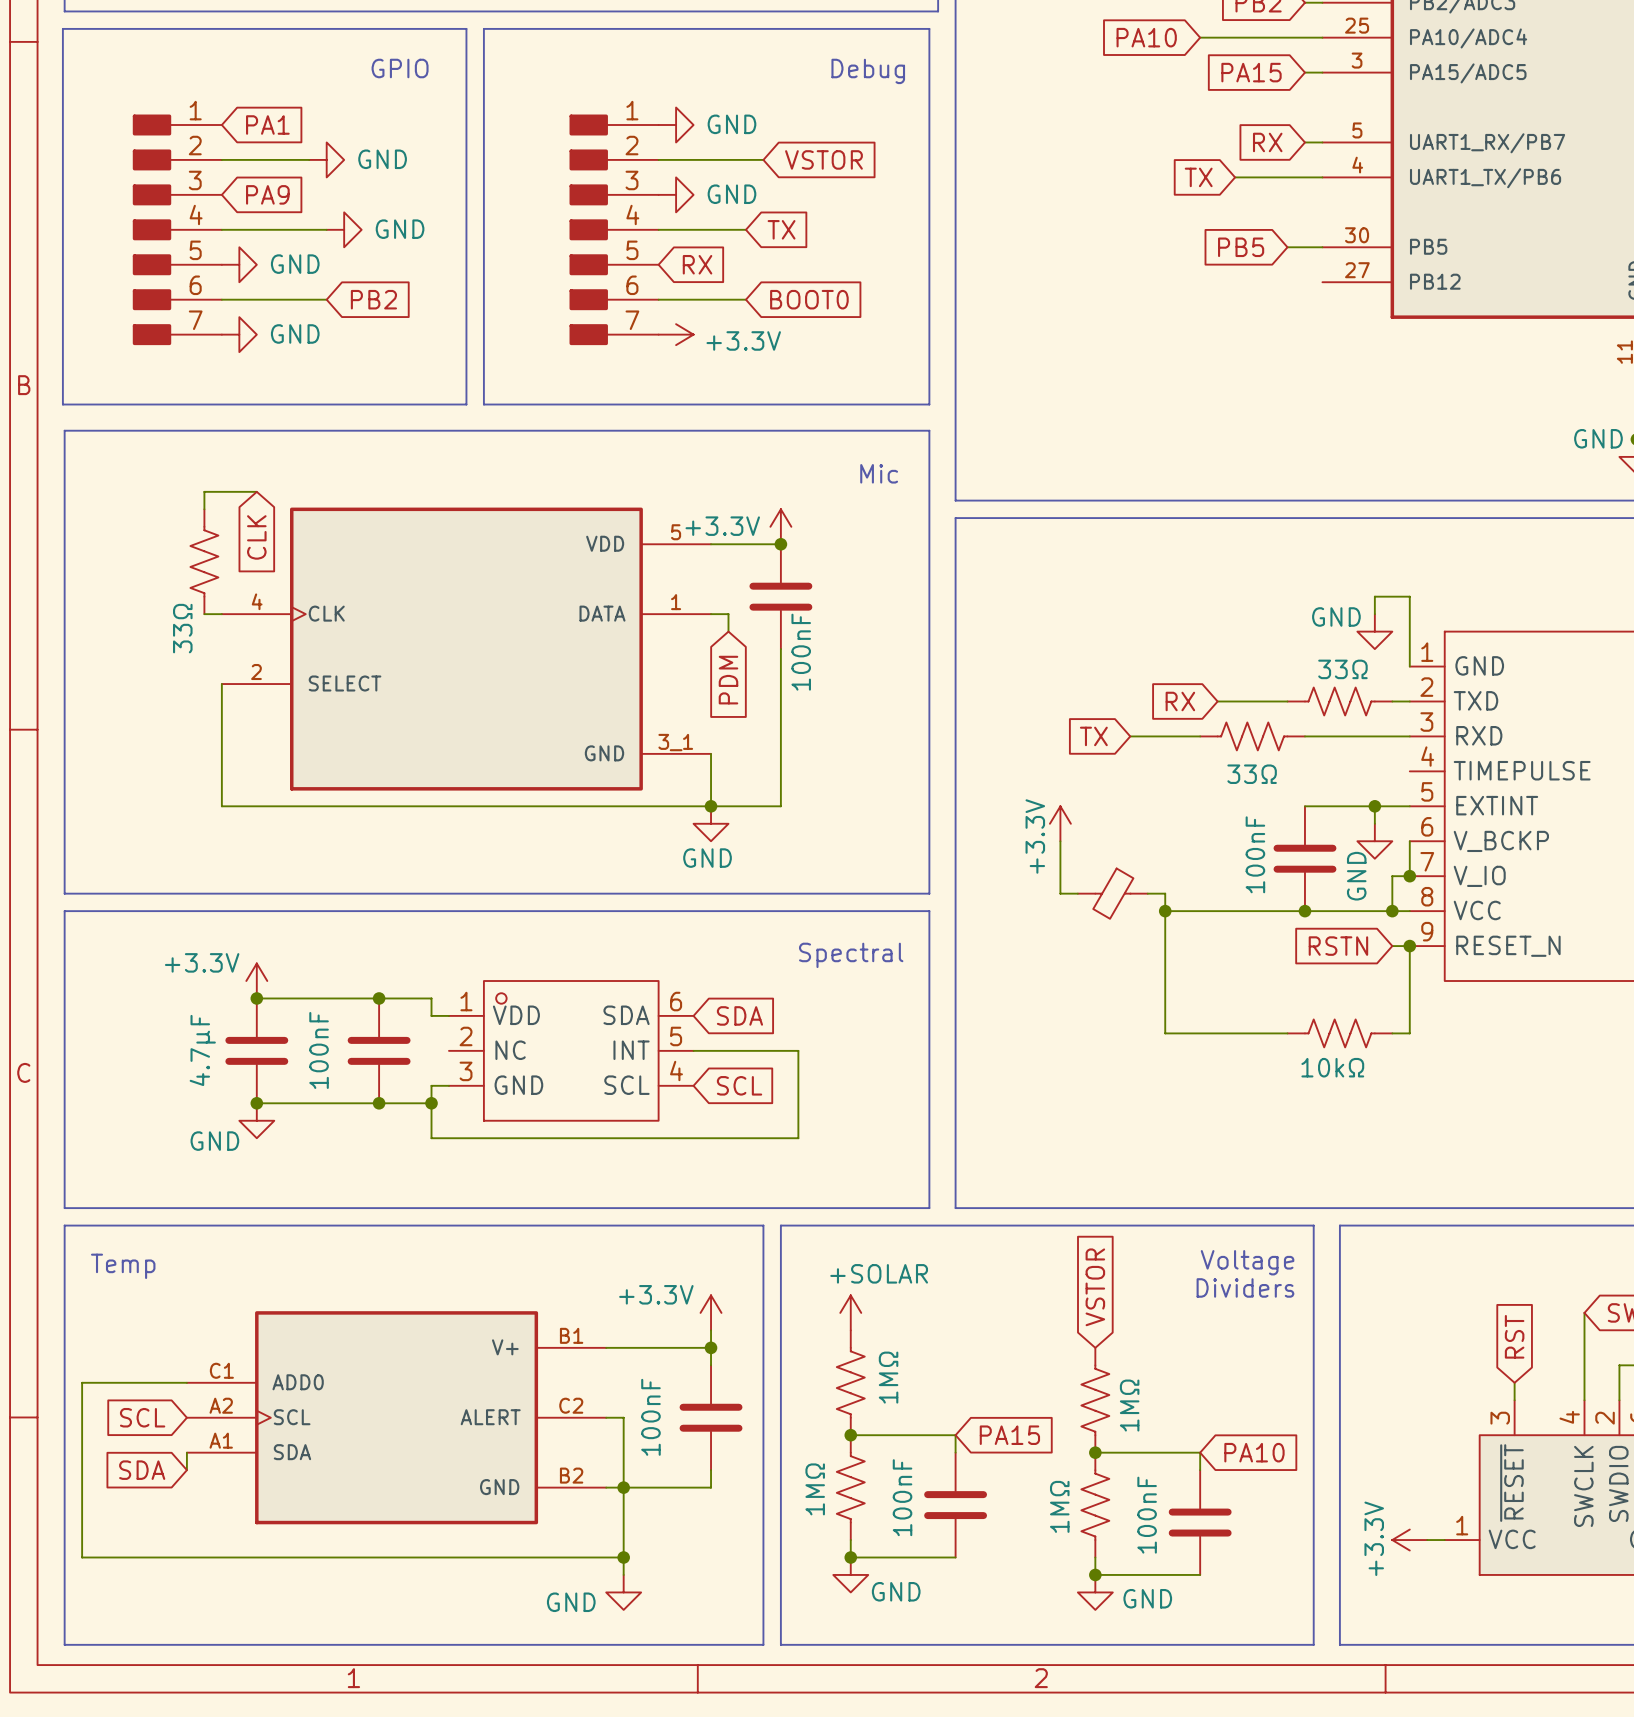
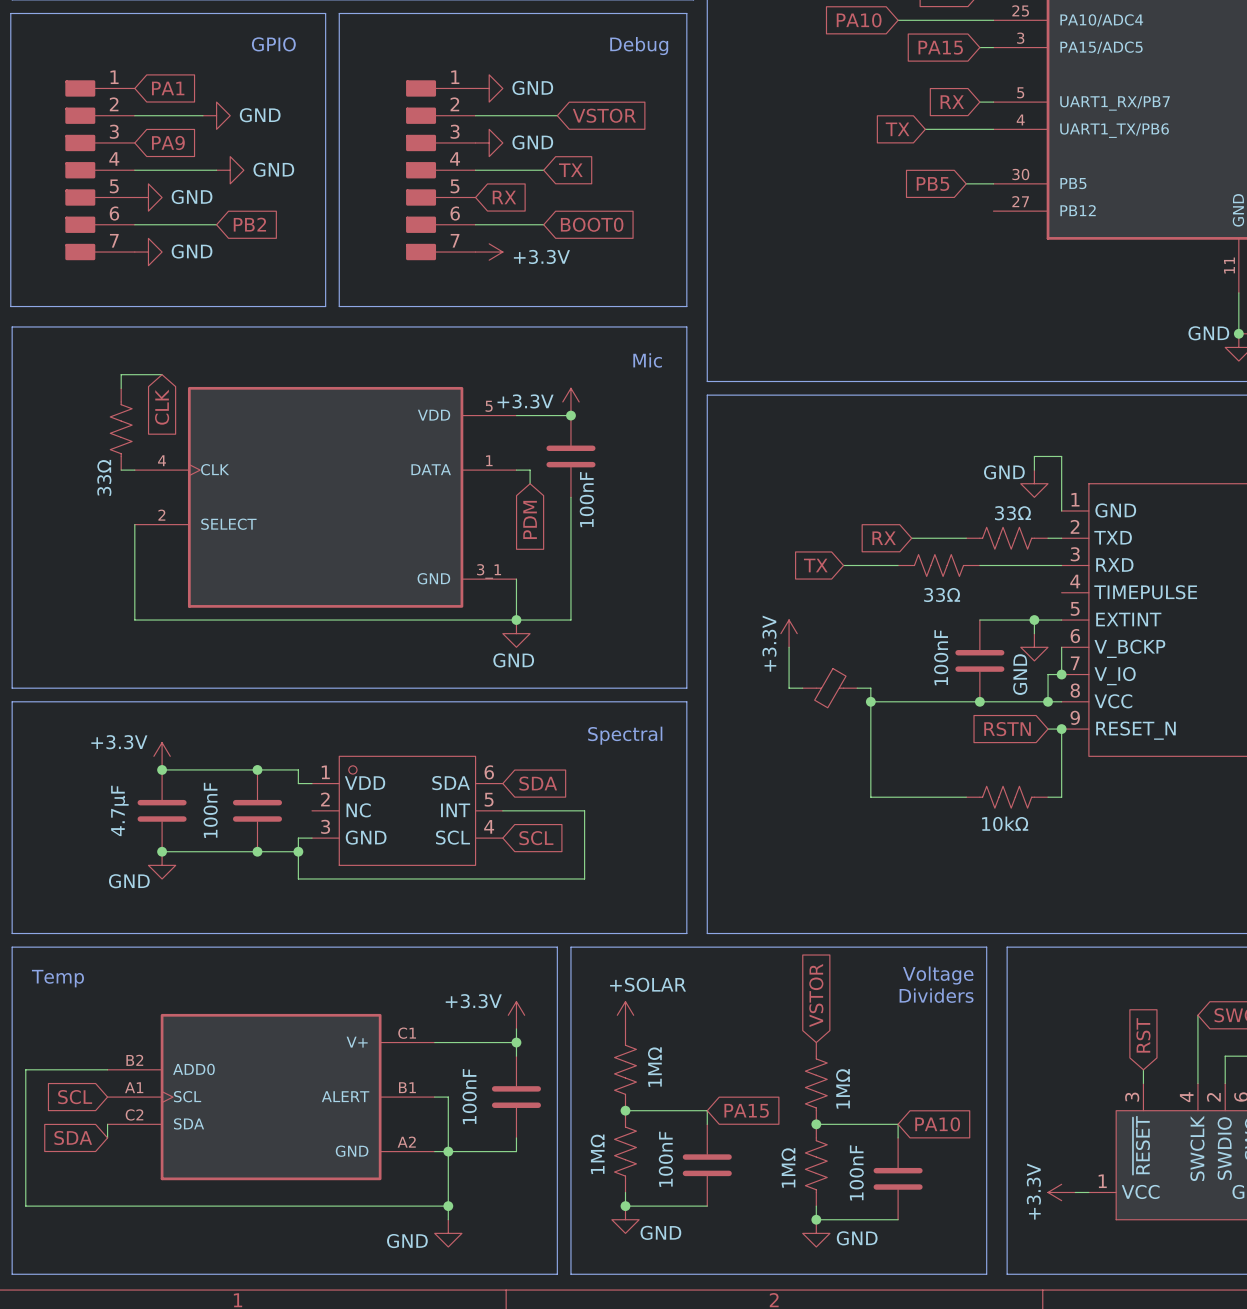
part pin number: B1 (571, 1335) -> C1 (407, 1033)
part pin number: C1 (221, 1370) -> B2 (134, 1060)
part pin number: A2 (221, 1405) -> A1 (134, 1087)
part pin number: C2 (571, 1405) -> B1 (407, 1087)
part pin number: A1 (221, 1440) -> C2 (134, 1114)
part pin number: B2 (571, 1475) -> A2 (406, 1142)

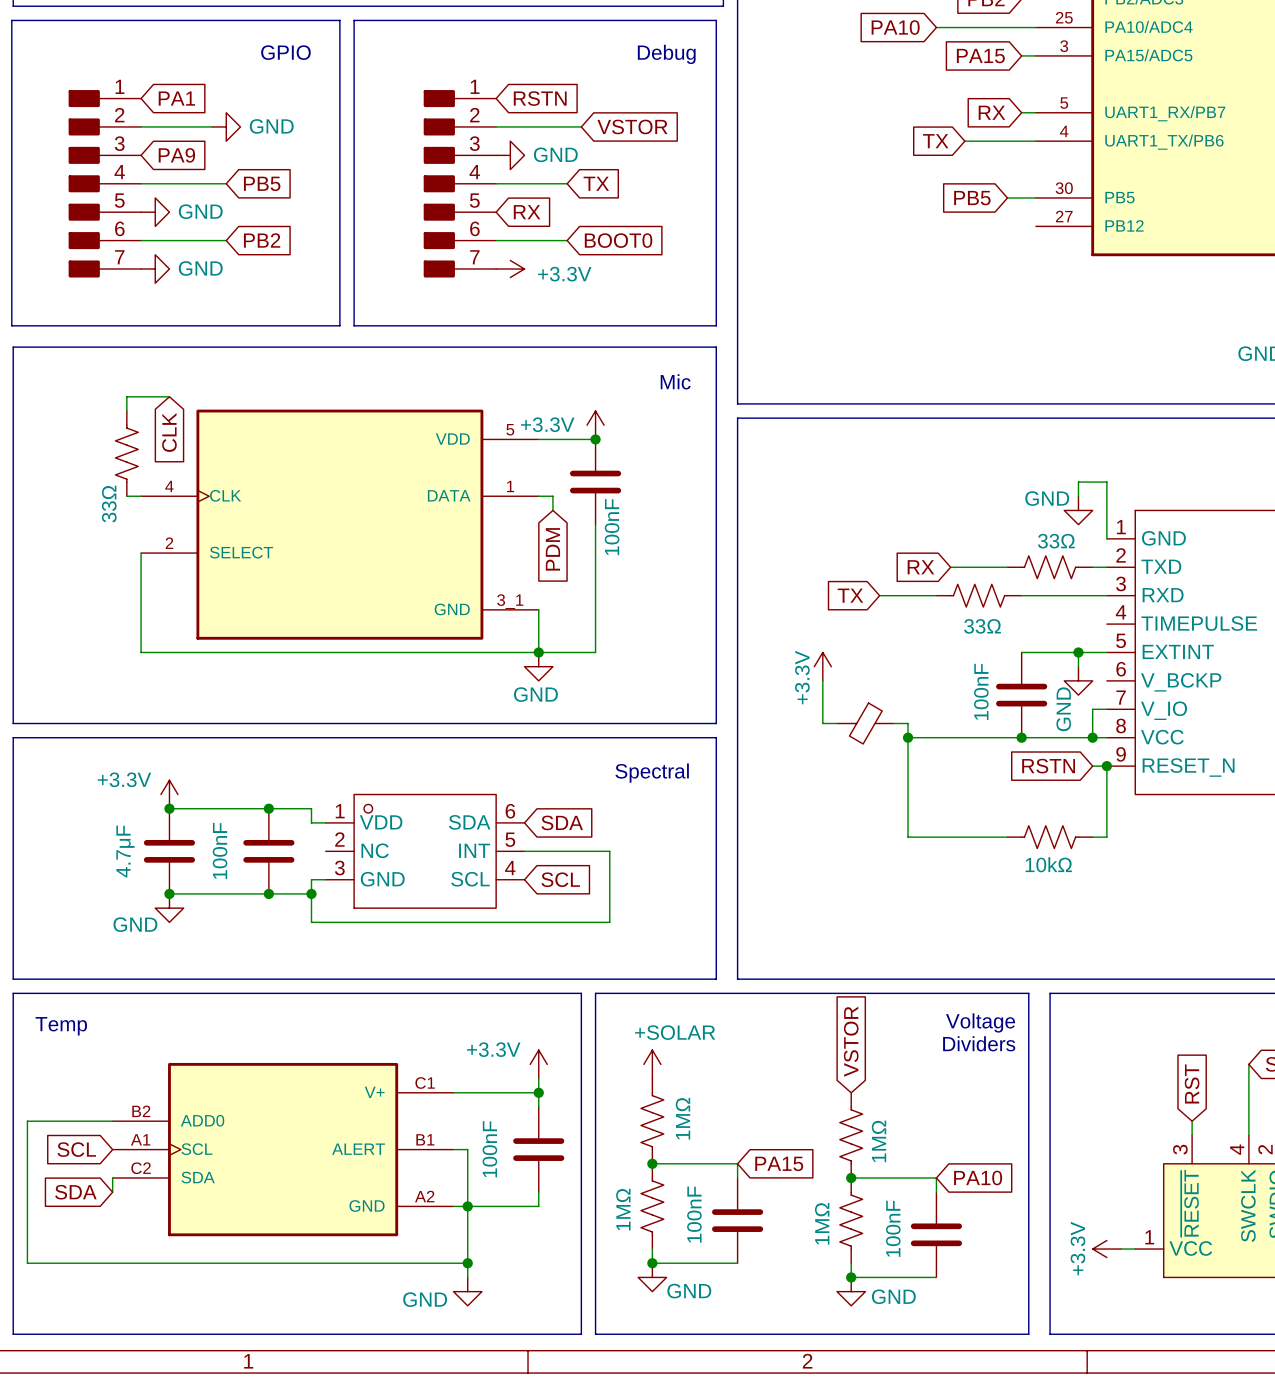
power symbol: GND (489, 88) -> none
global label: none -> RSTN (540, 98)
power symbol: GND (230, 170) -> none
global label: none -> PB5 (262, 183)
wire: (1061, 647) (1061, 674) -> none
junction: (1061, 674) -> none

